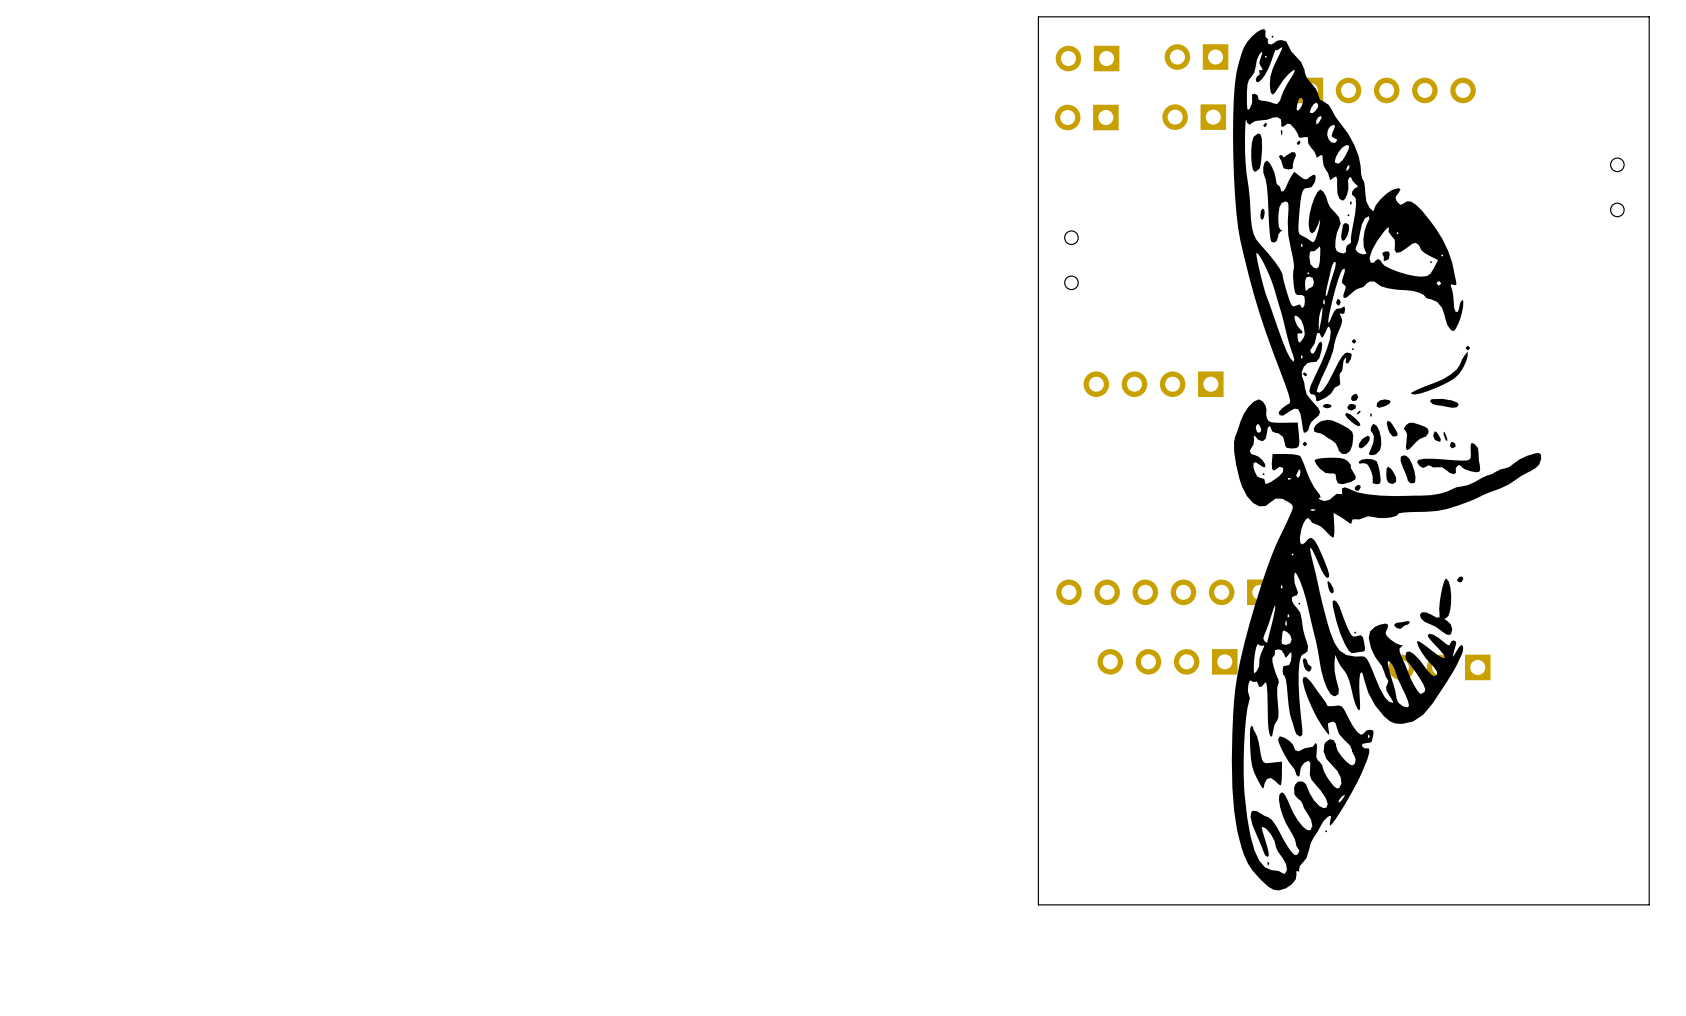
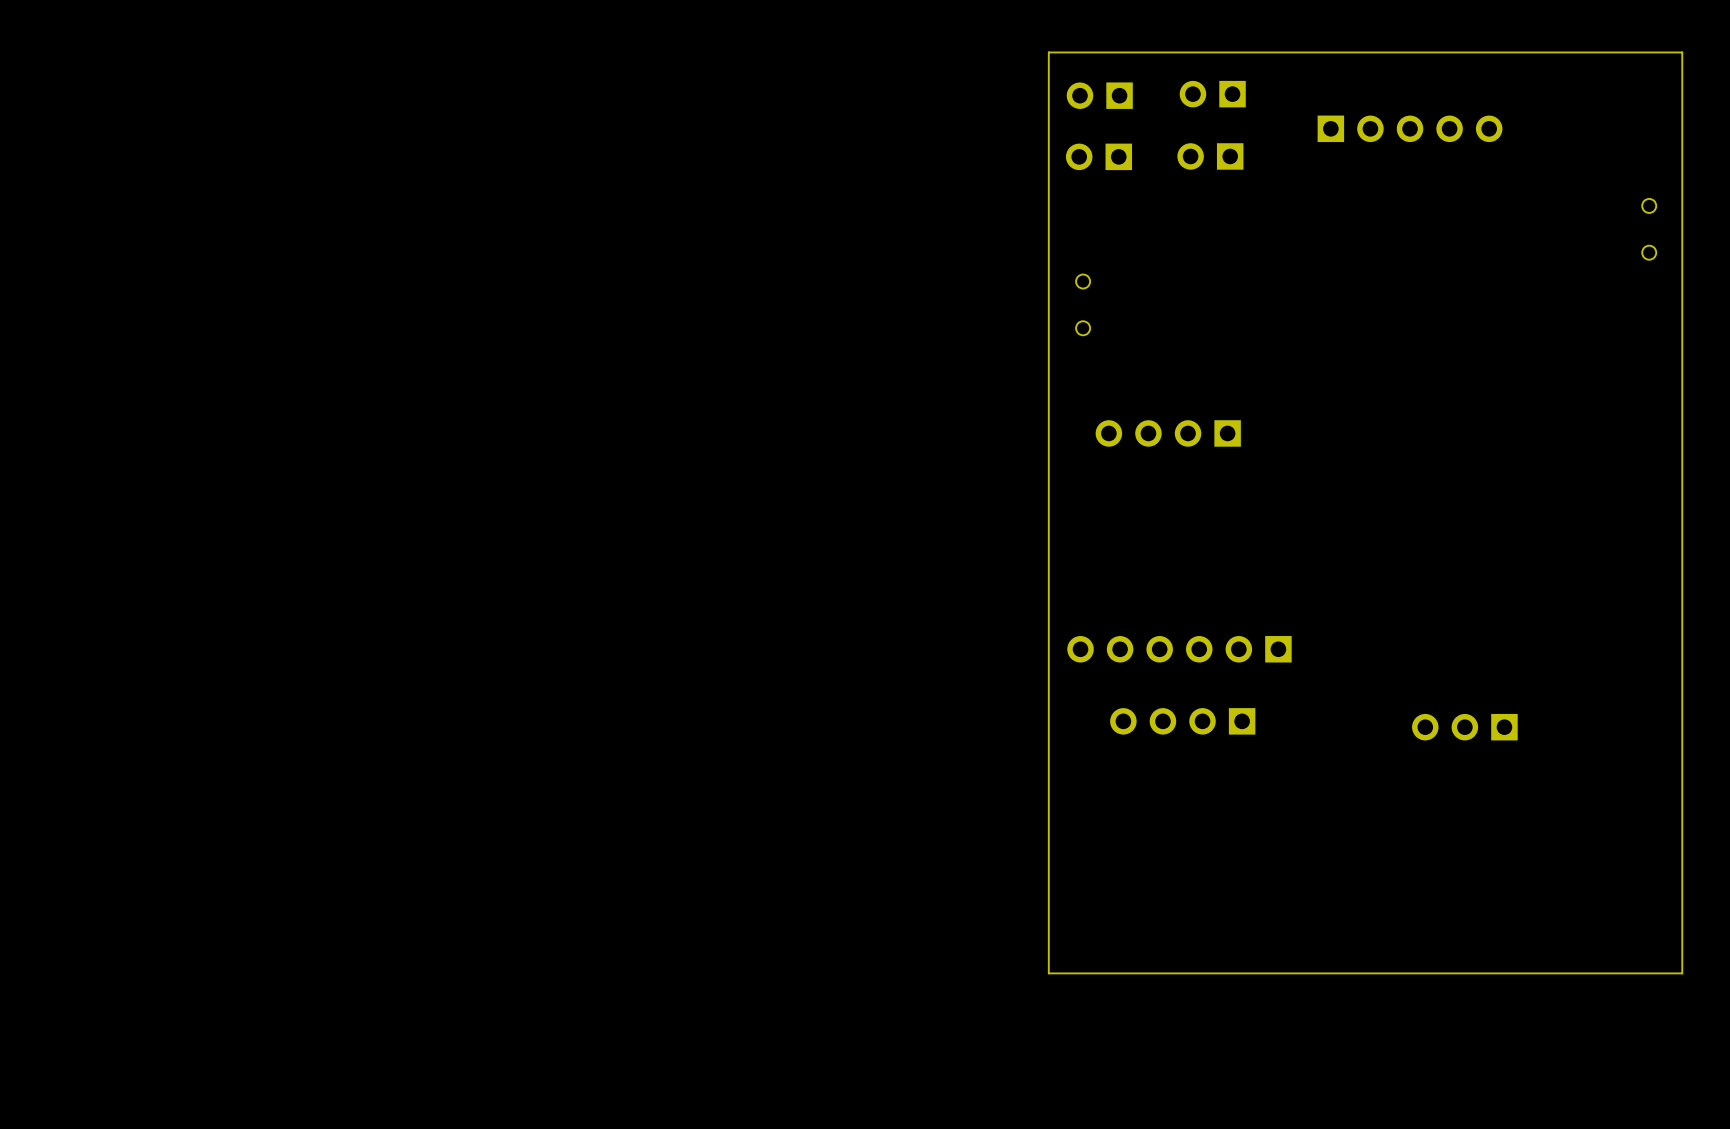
drawing: [1231, 29, 1542, 891] -> none

